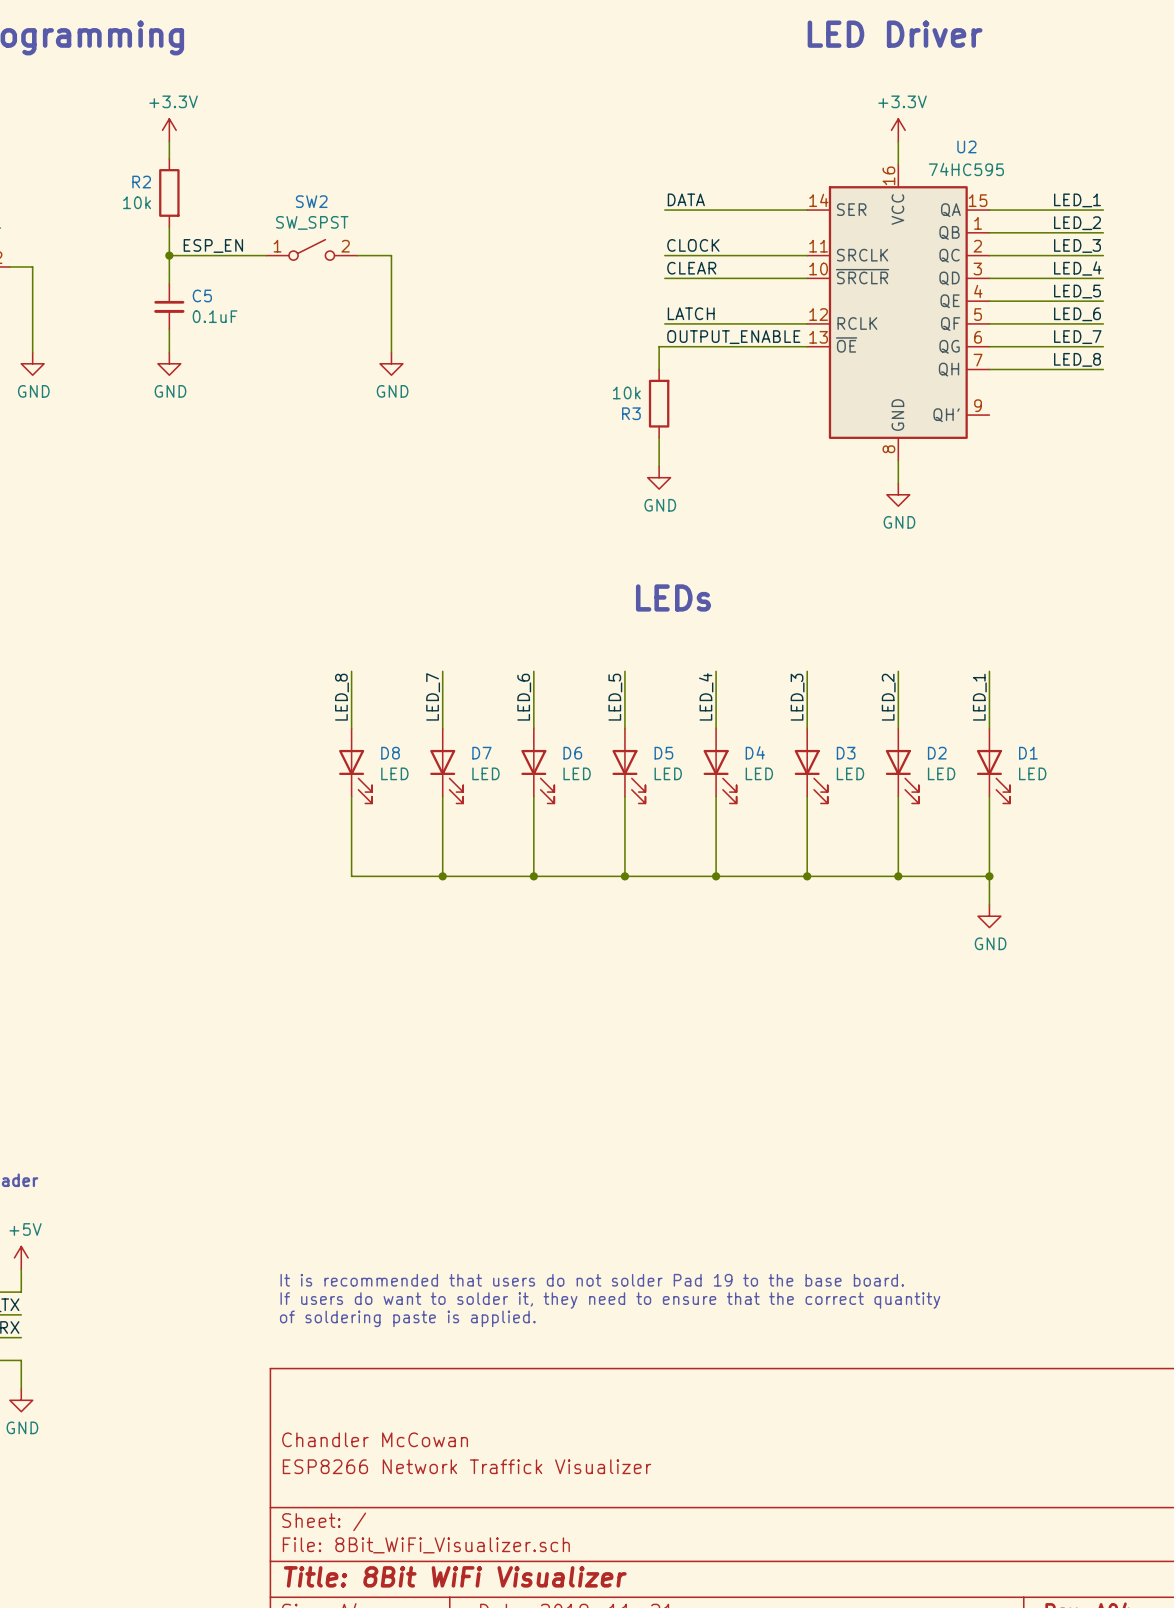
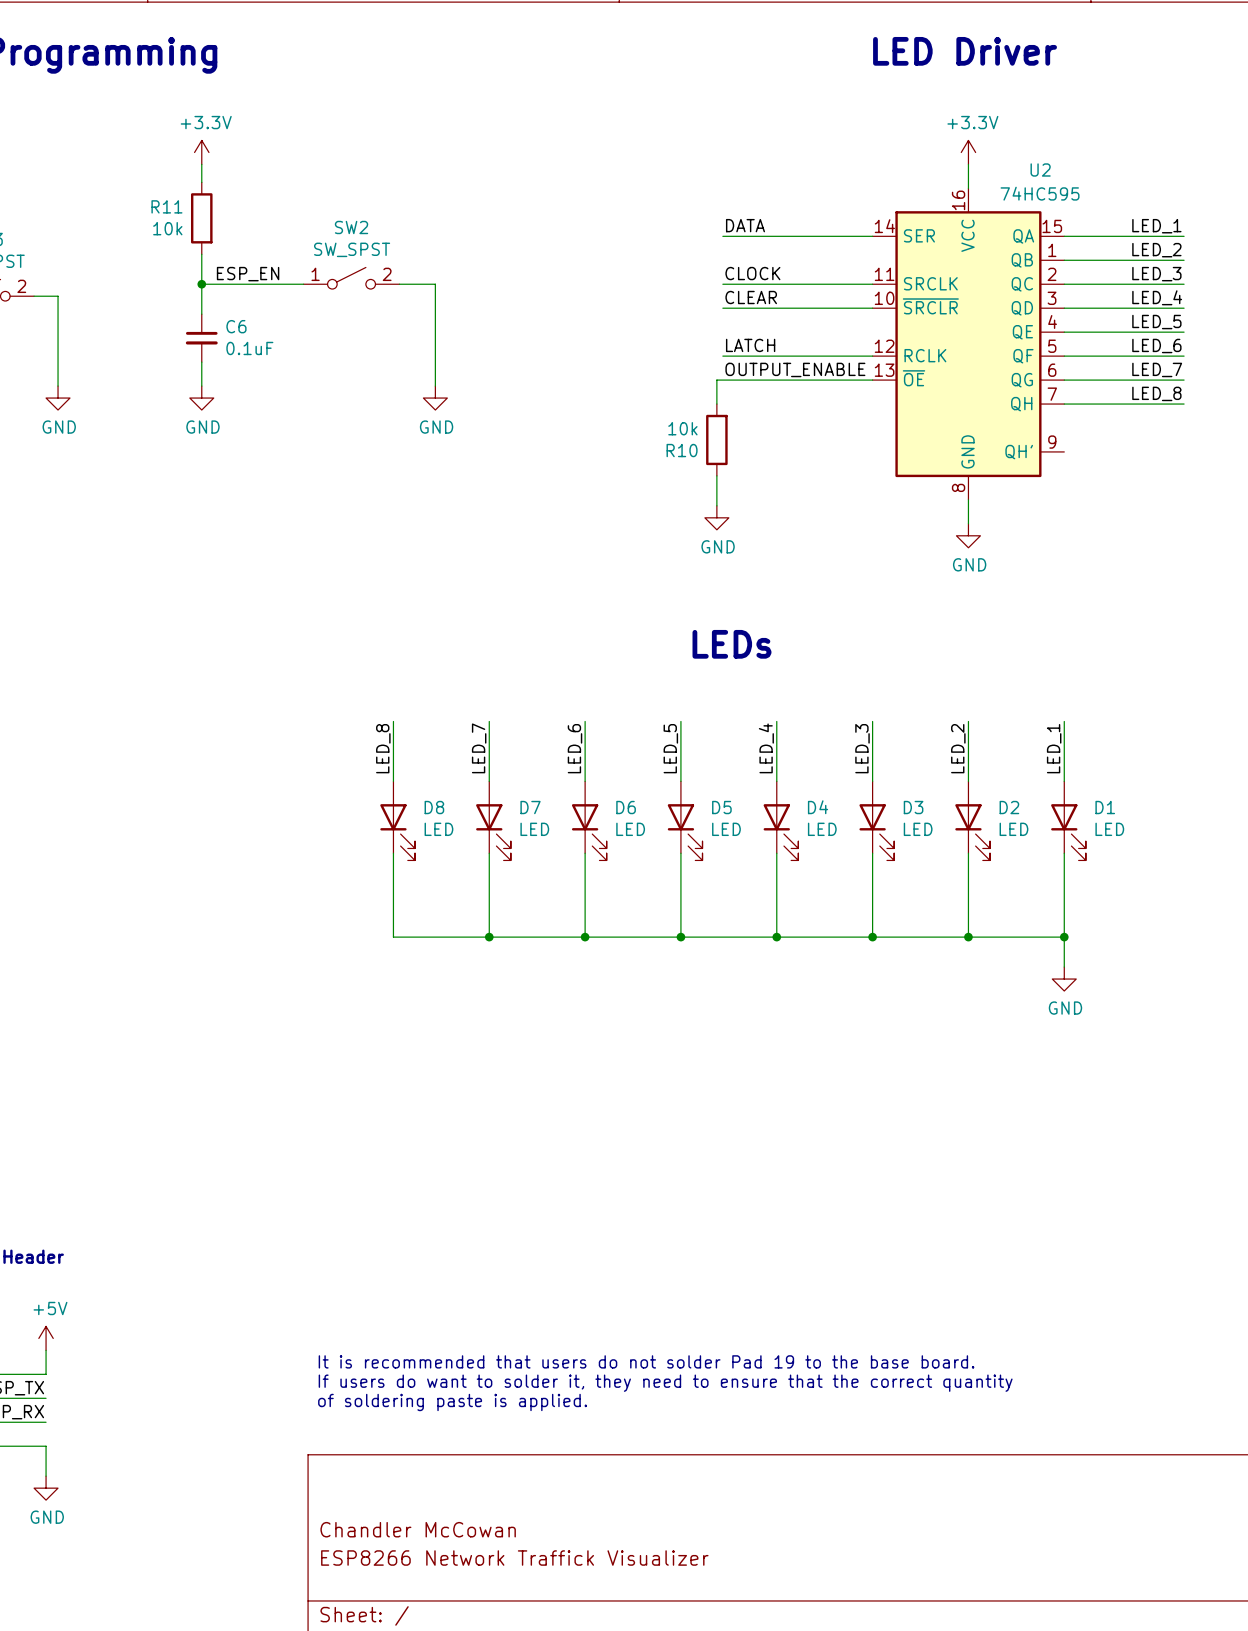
R2 name: R2 (141, 182) -> R11 (166, 206)
C5 name: C5 (202, 295) -> C6 (236, 326)
R3 name: R3 (631, 413) -> R10 (682, 450)

